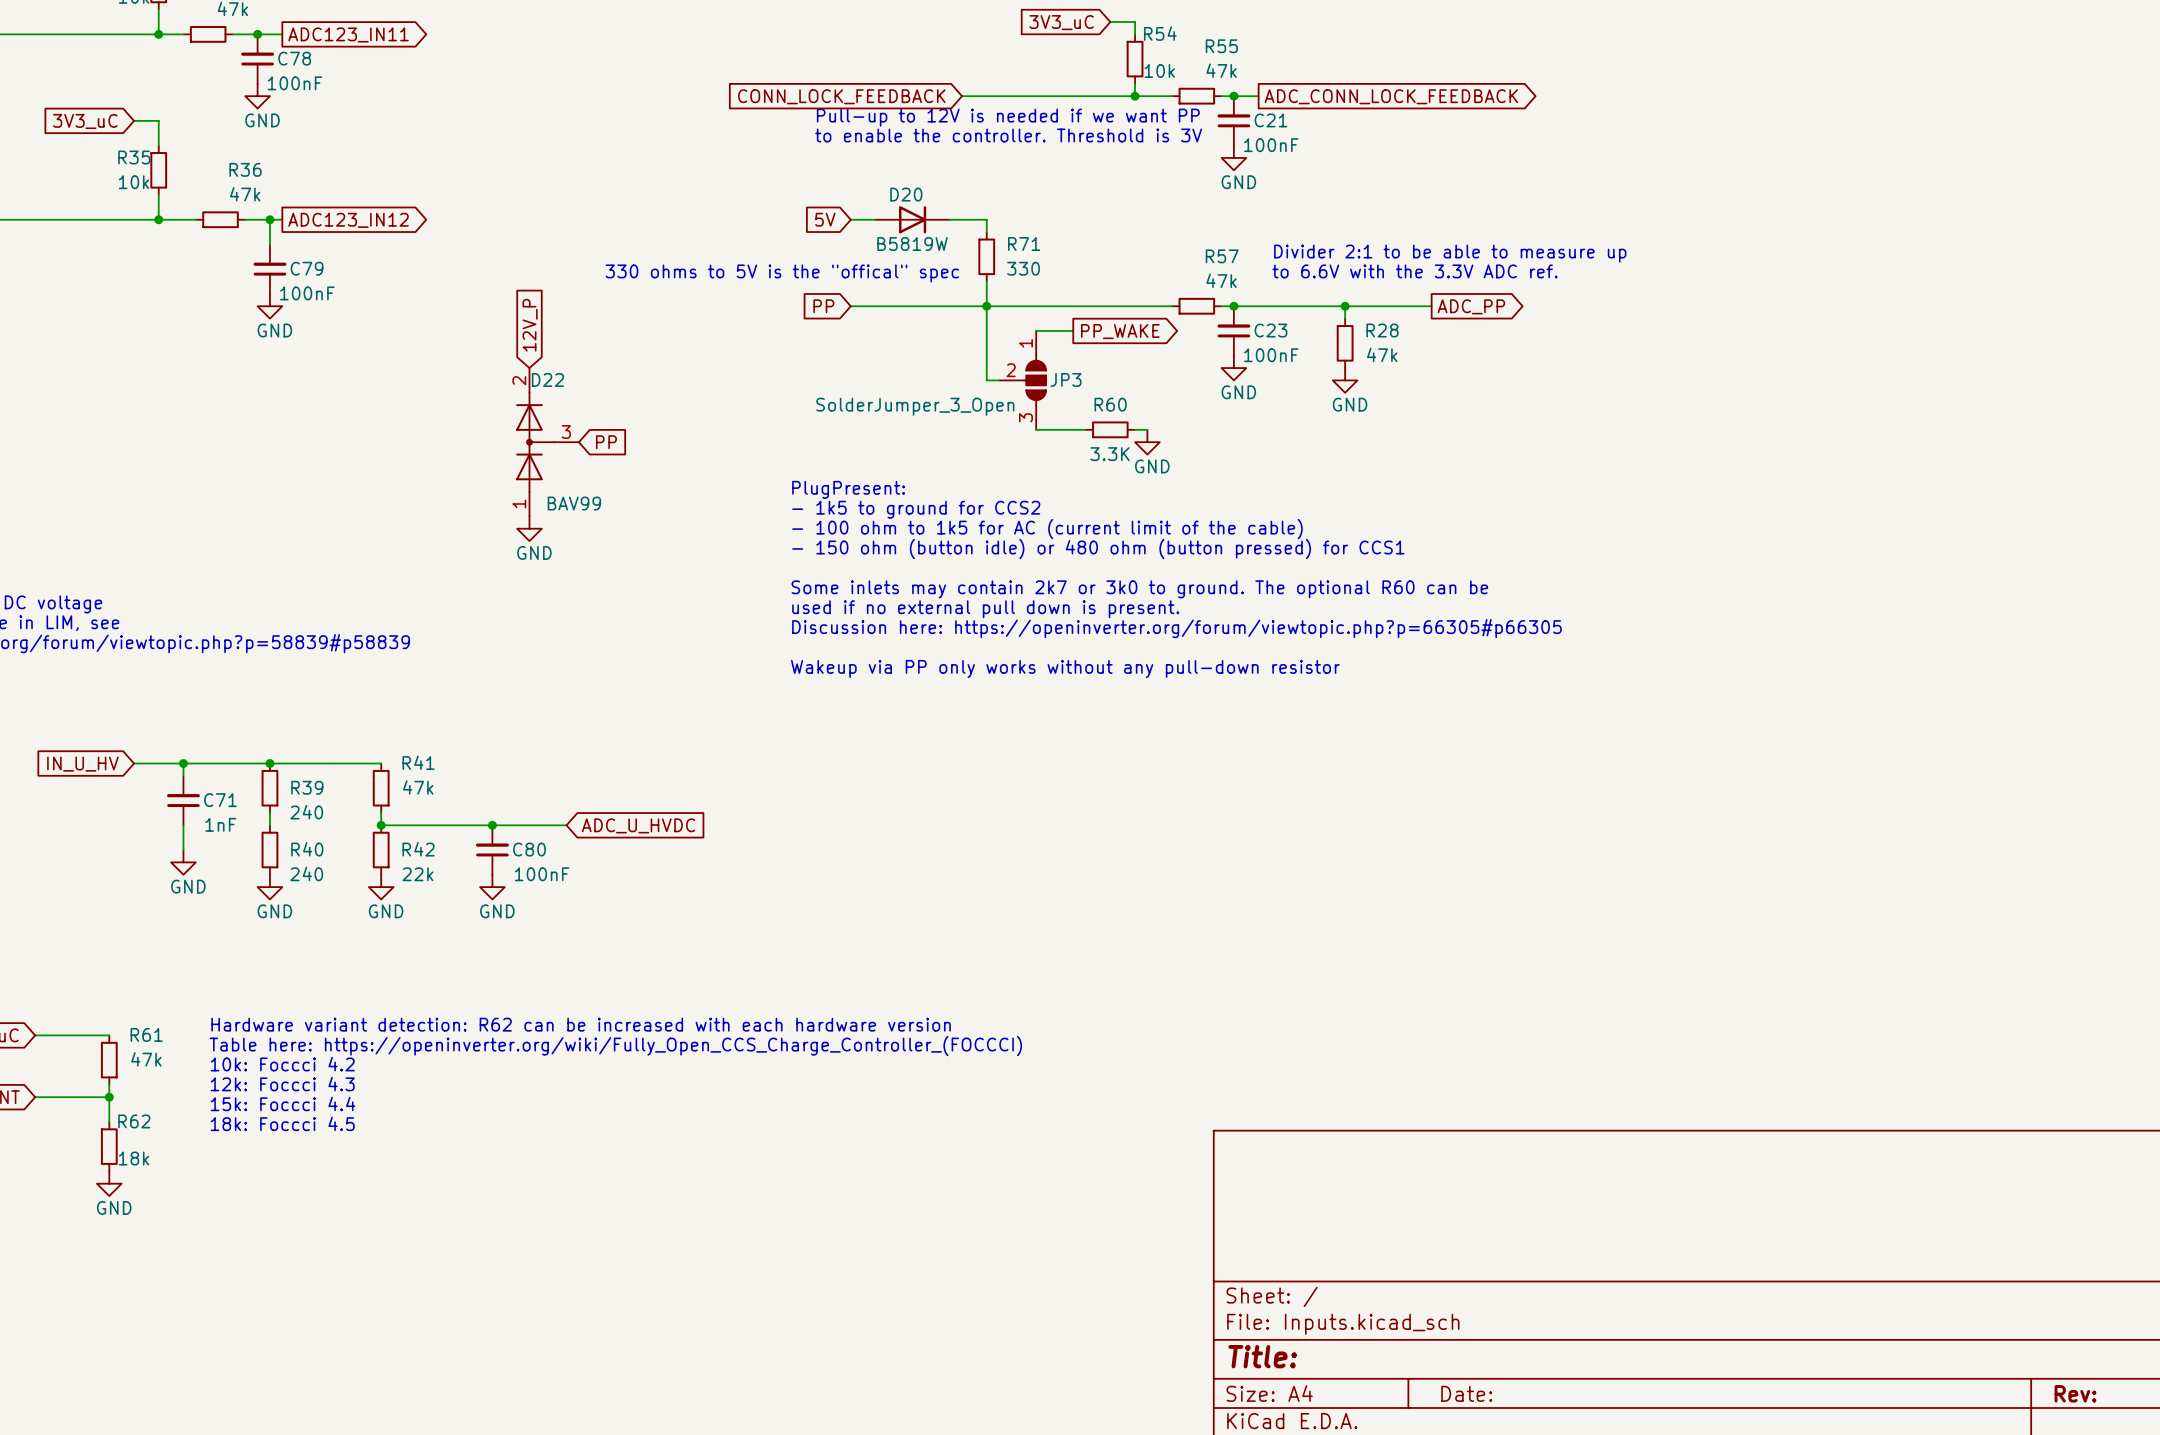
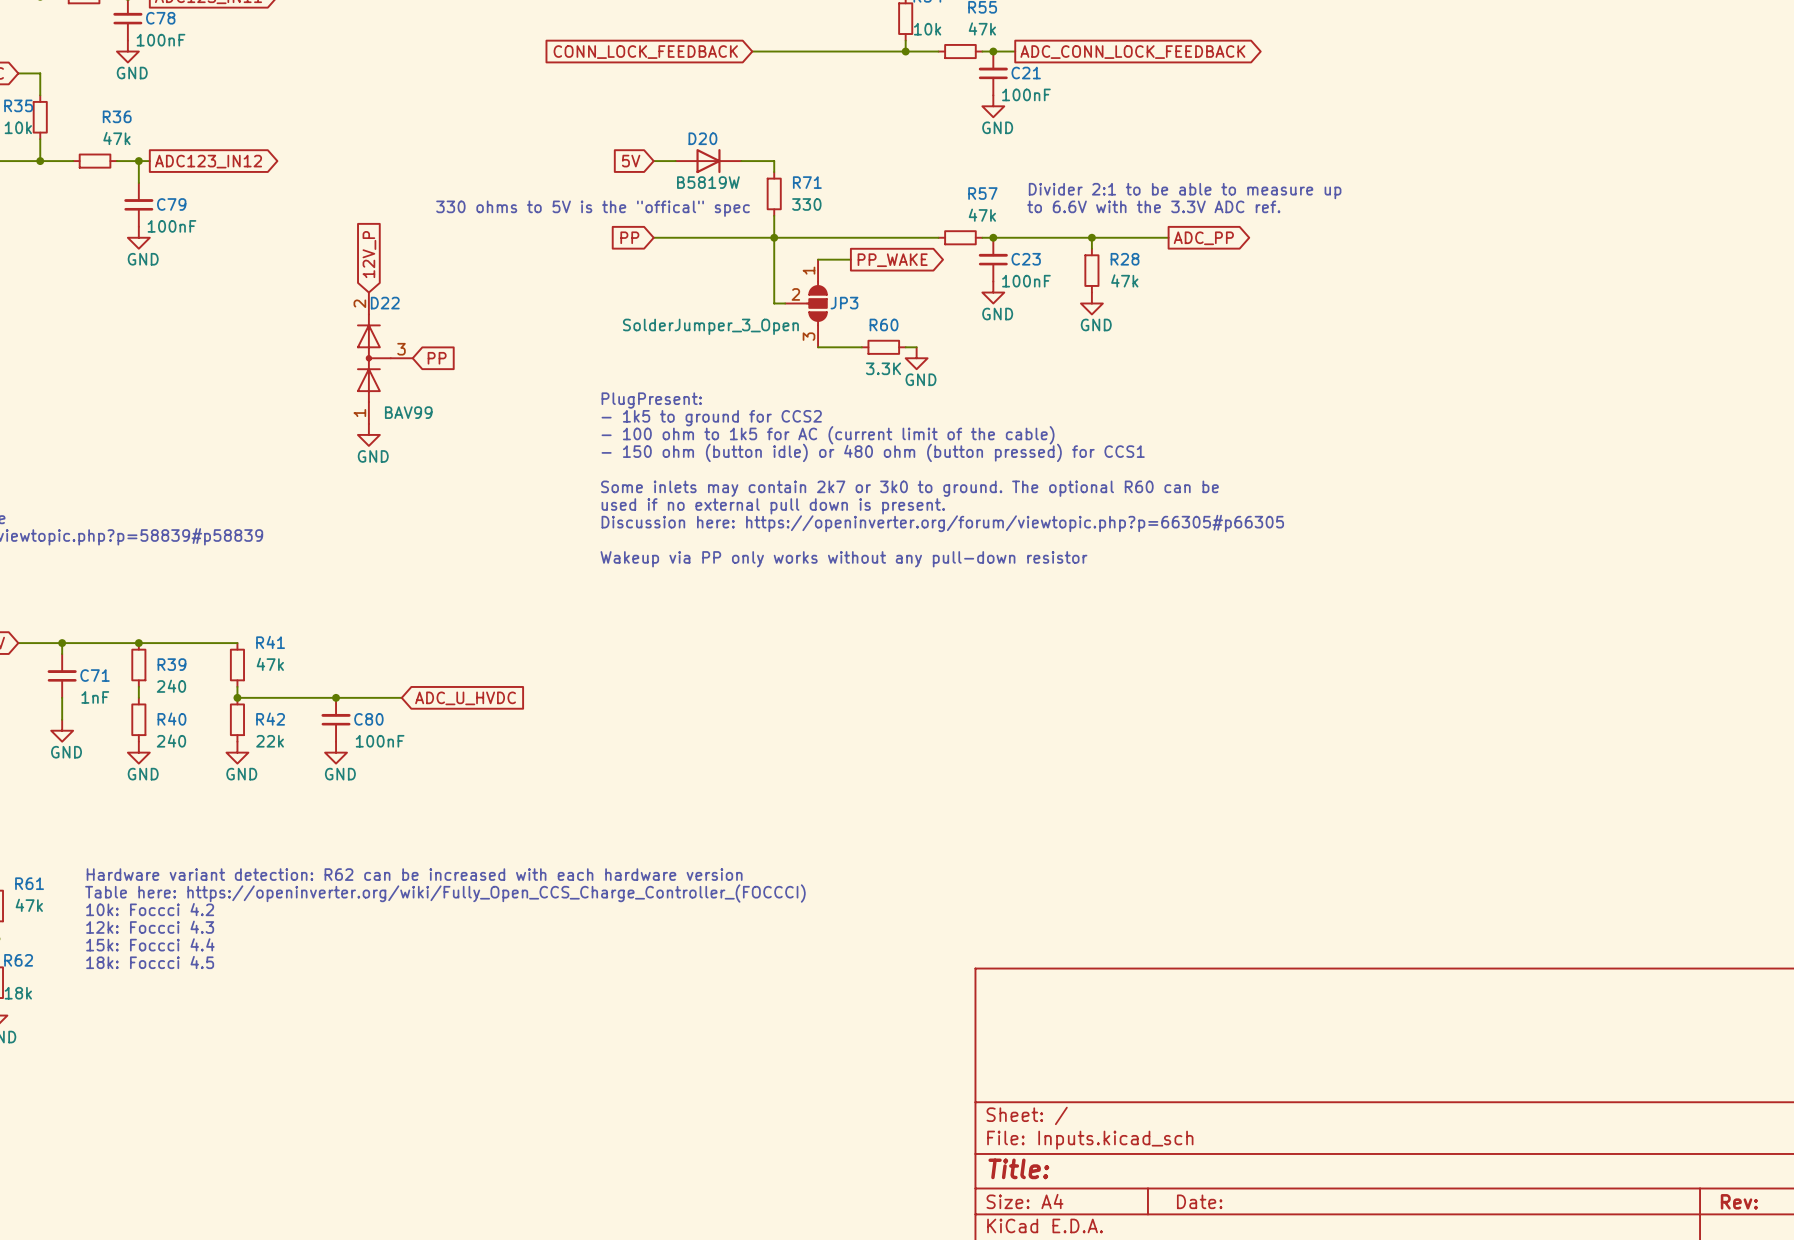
text: Pull-up to 12V is needed if we want PP (1008, 117) -> none
text: to enable the controller. Threshold is 3V (1008, 135) -> none

